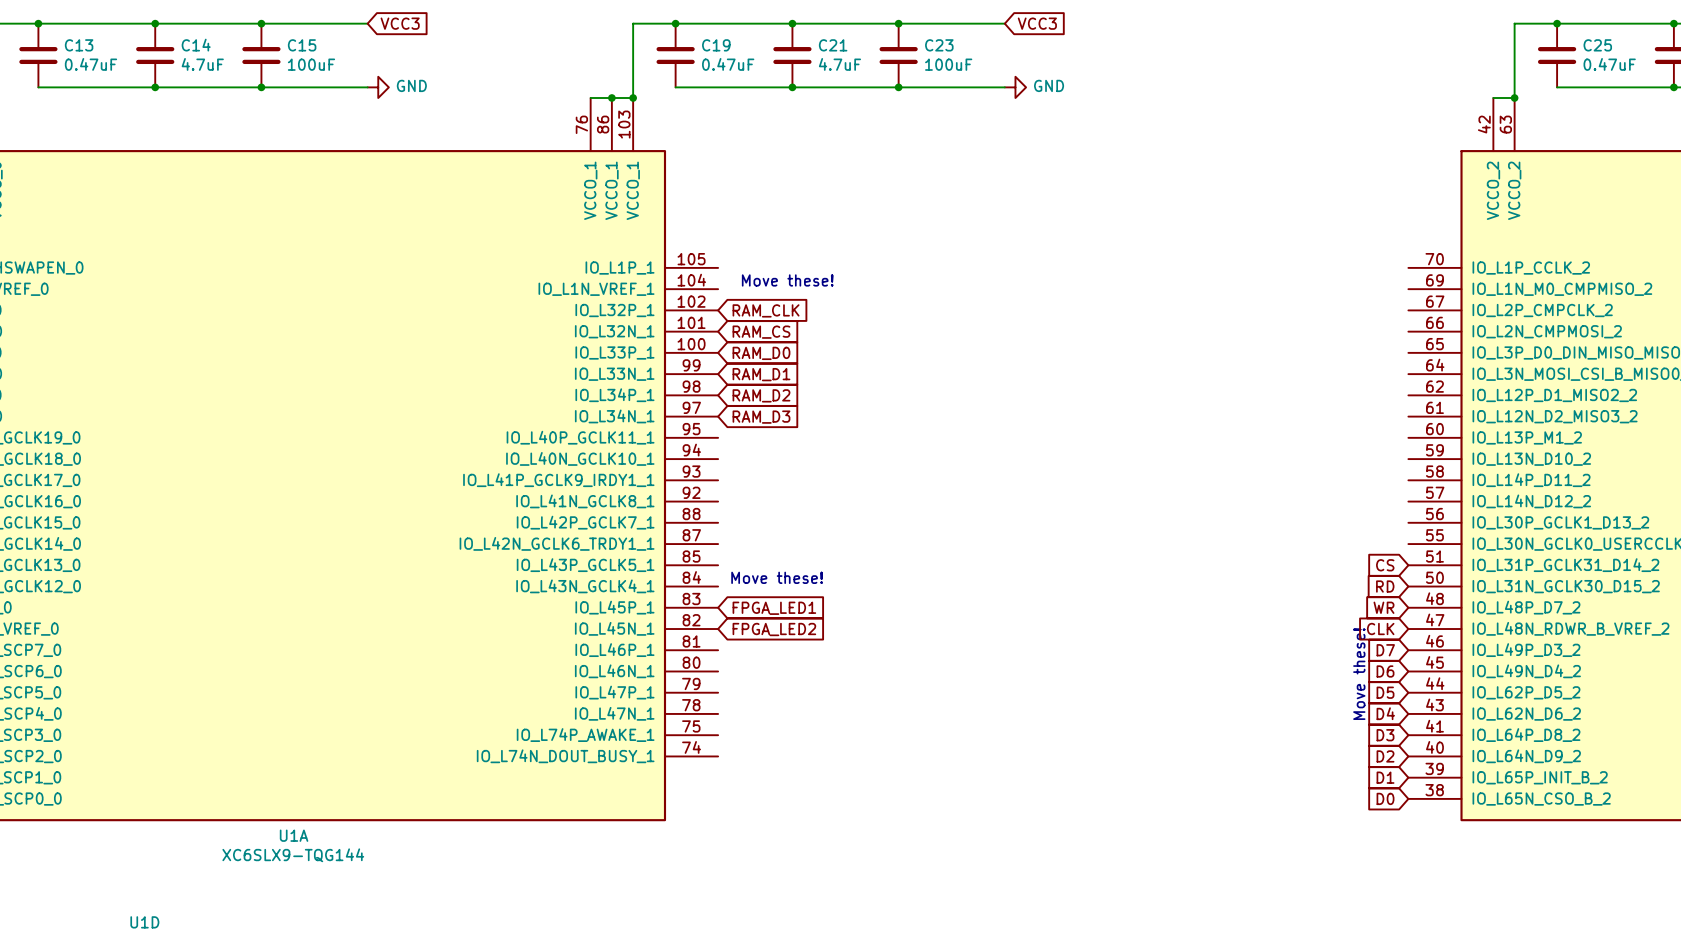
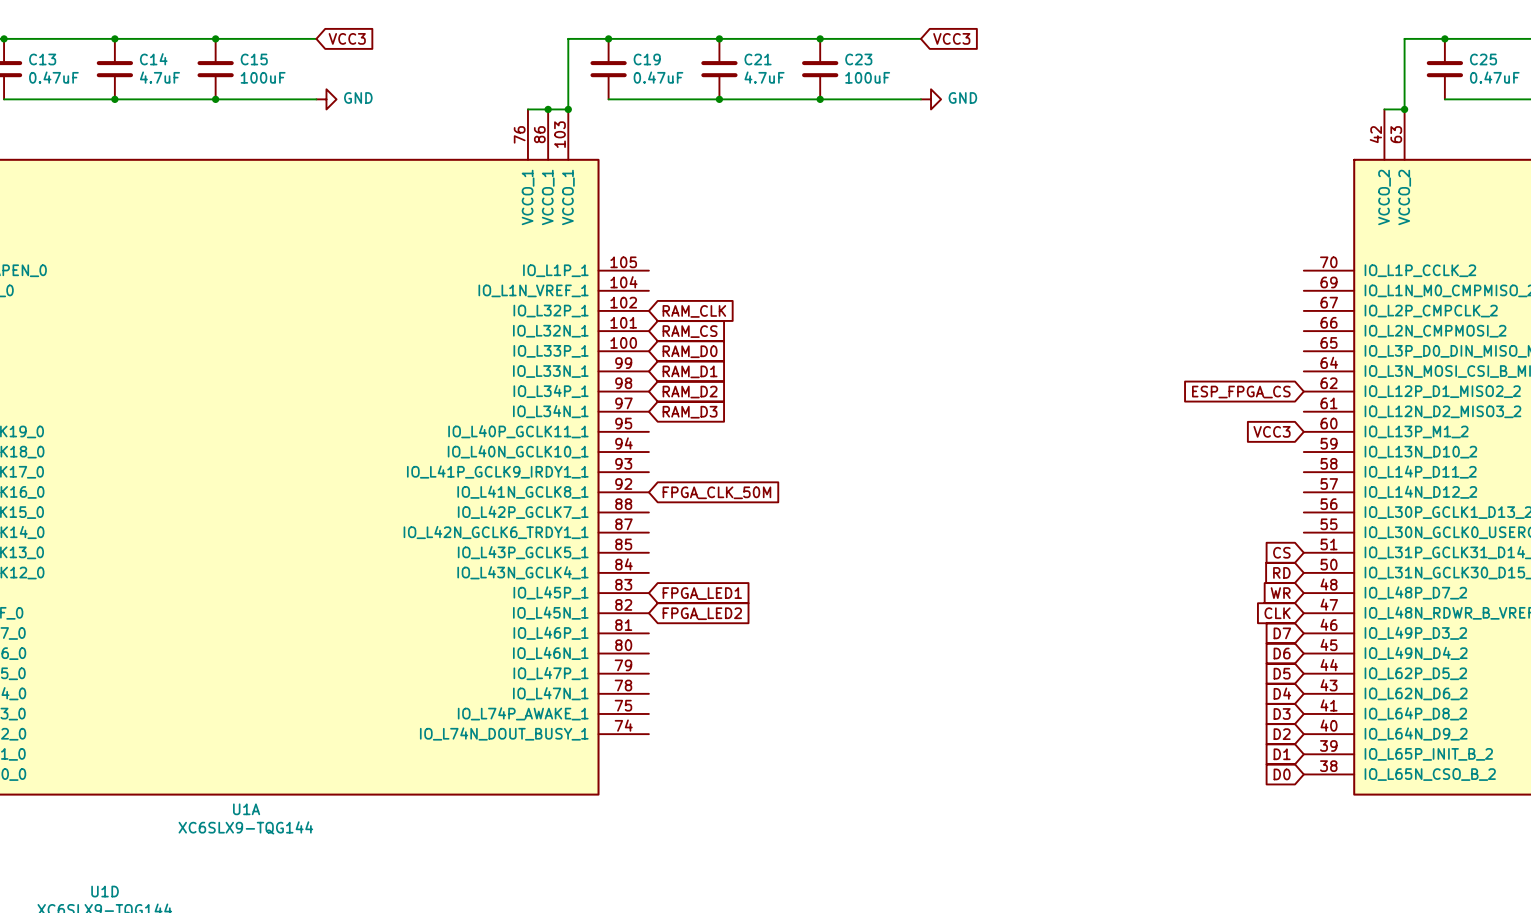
text: Move these! (787, 280) -> none
global label: none -> ESP_FPGA_CS (1241, 392)
global label: none -> VCC3 (1272, 431)
global label: none -> FPGA_CLK_50M (716, 492)
text: Move these! (777, 577) -> none
text: Move these! (1359, 674) -> none

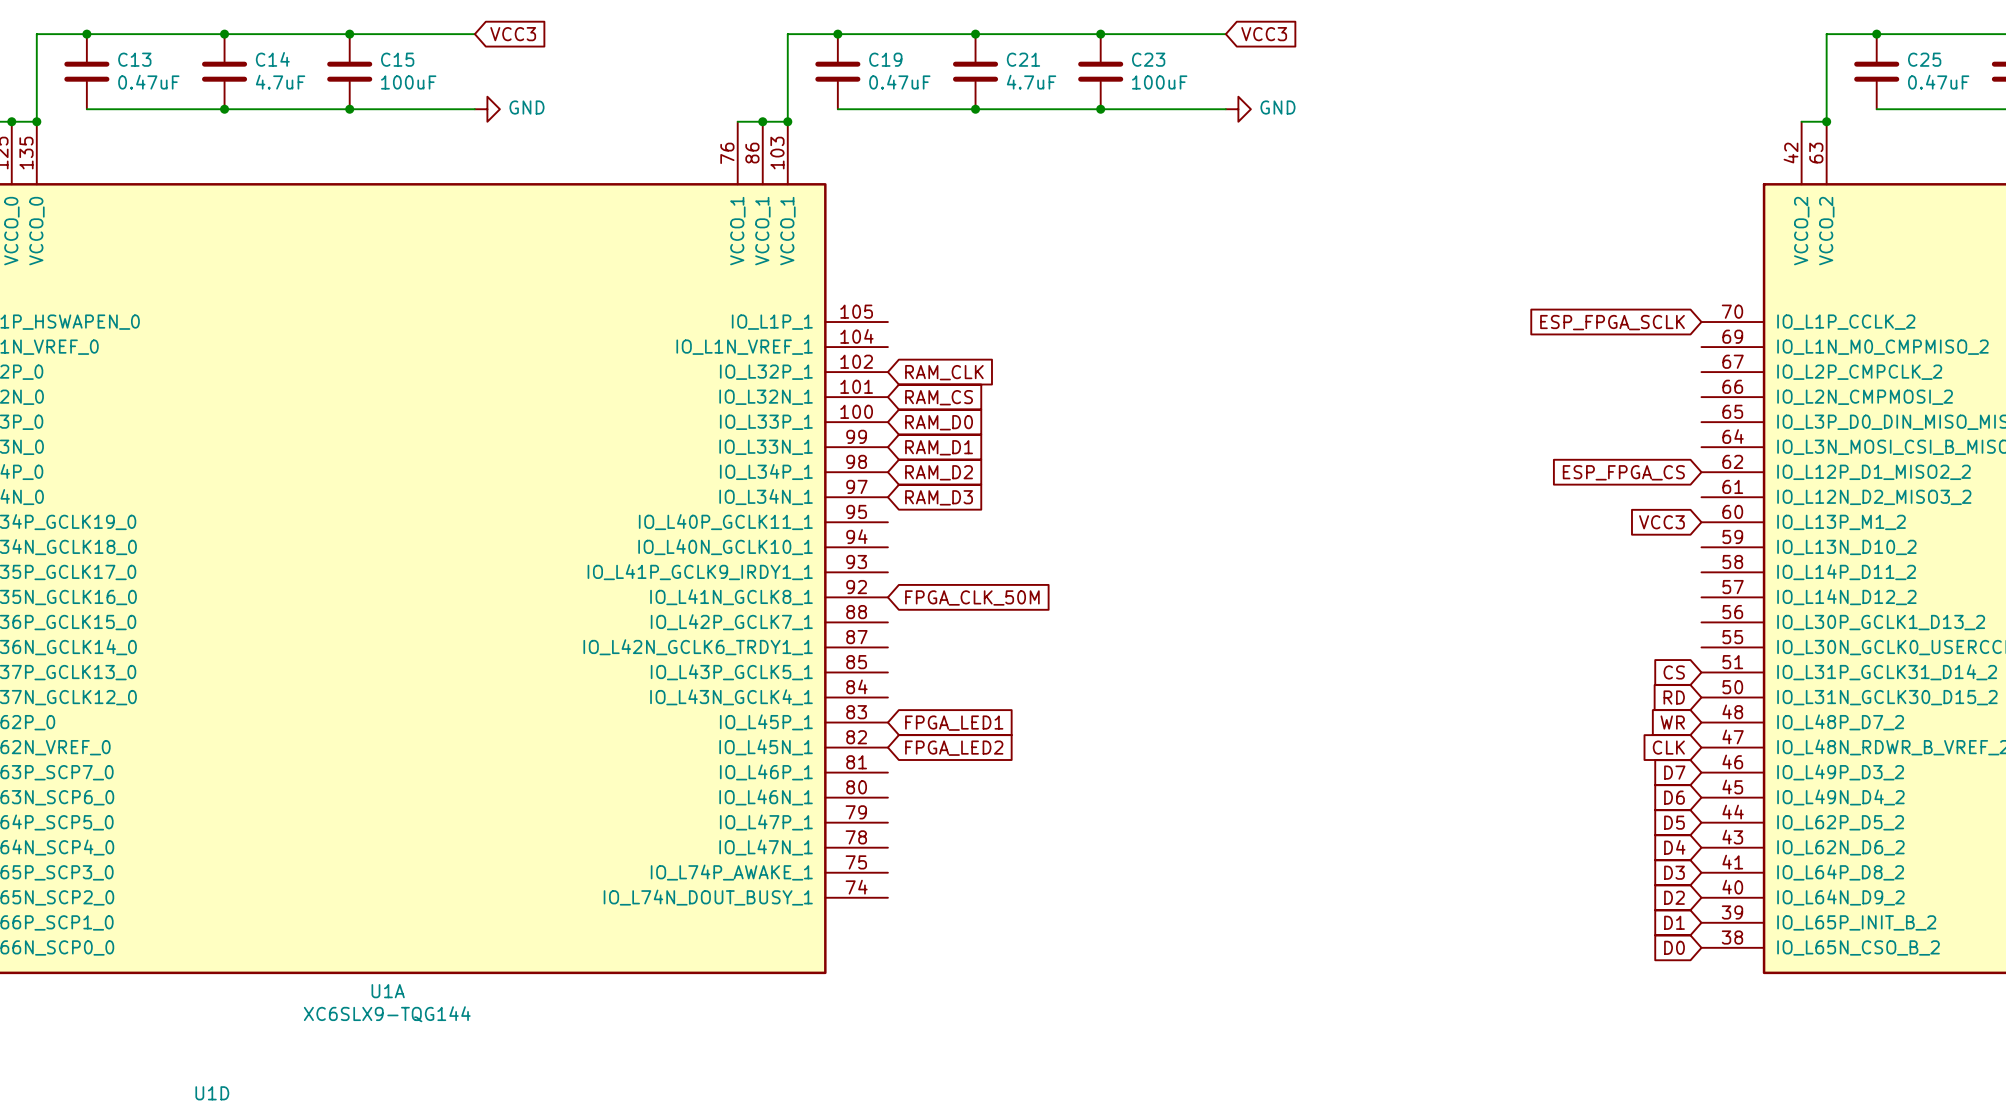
global label: none -> ESP_FPGA_SCLK (1612, 322)

